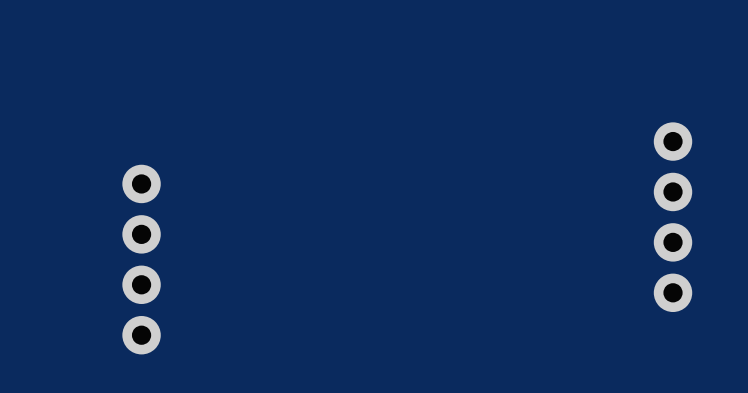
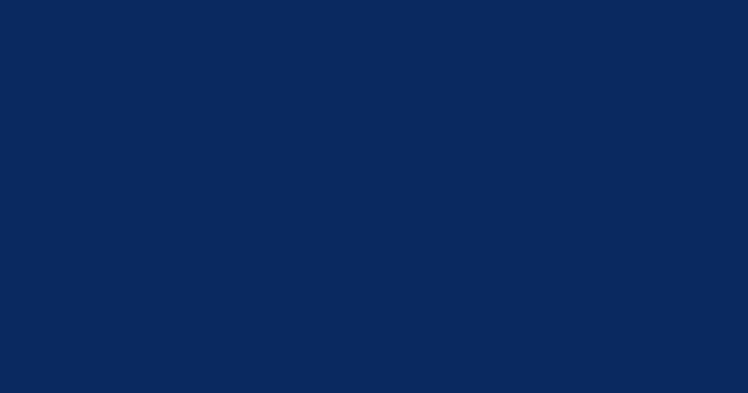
part: (673, 217) -> none
part: (141, 259) -> none

